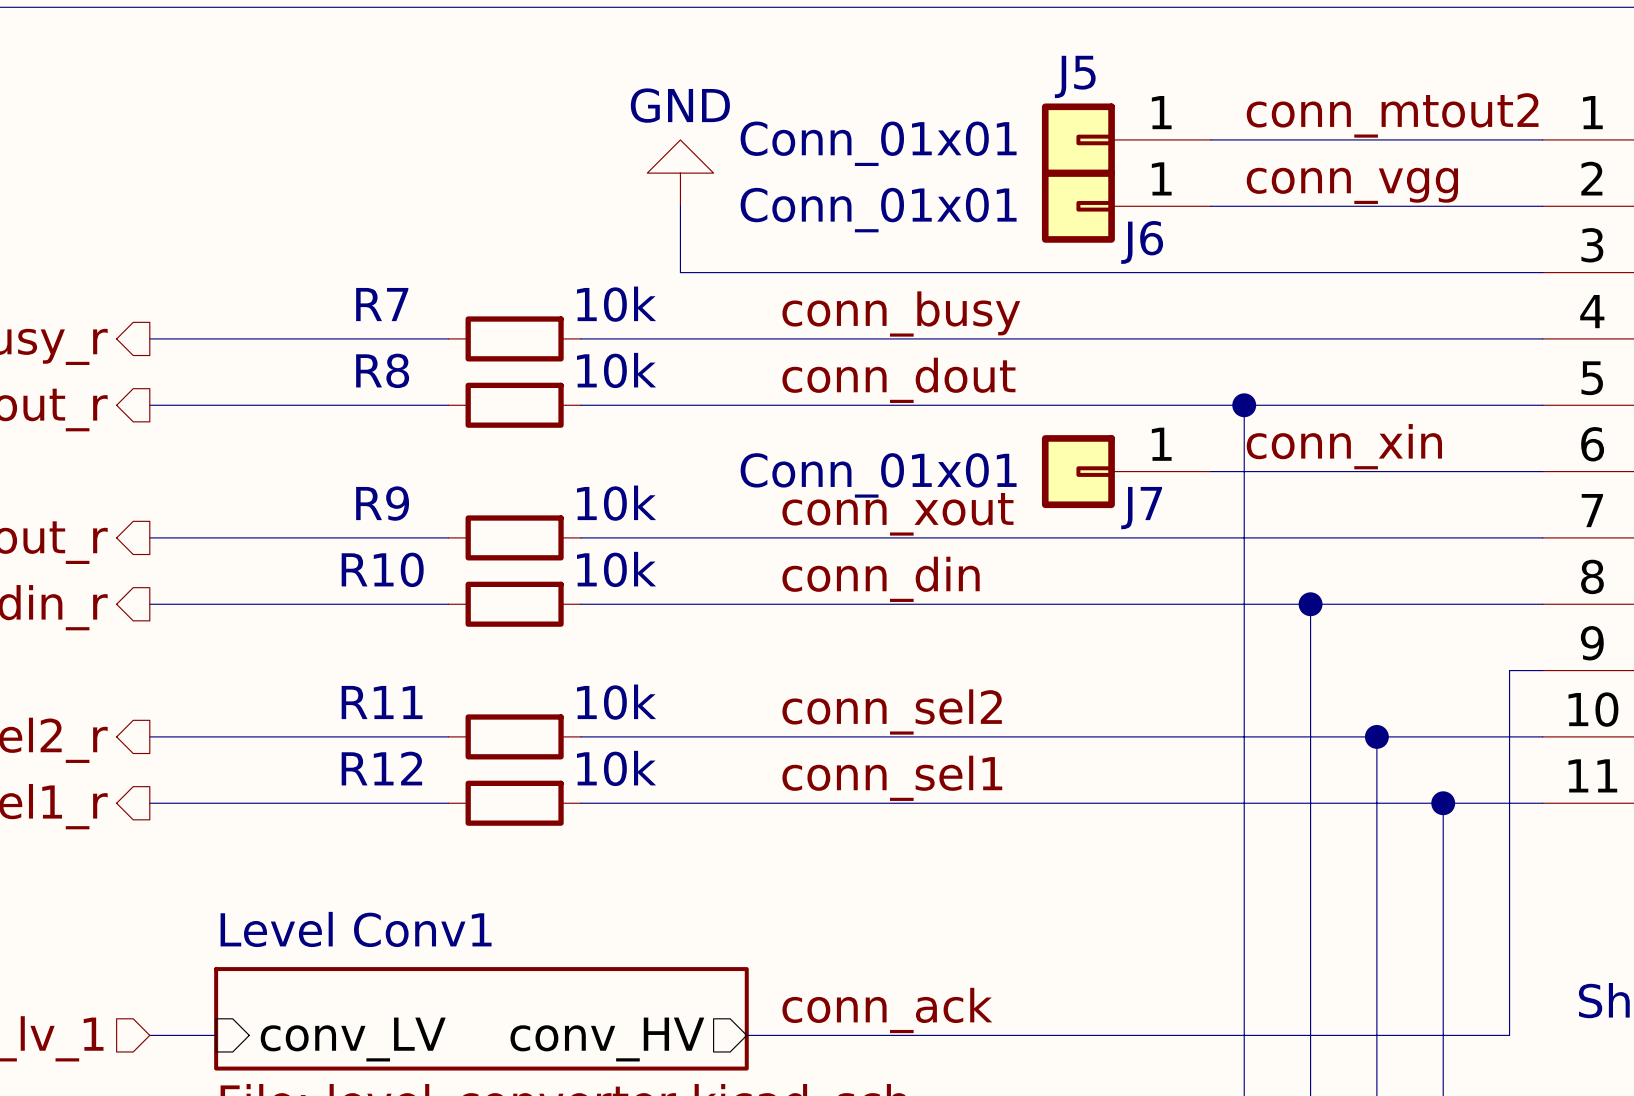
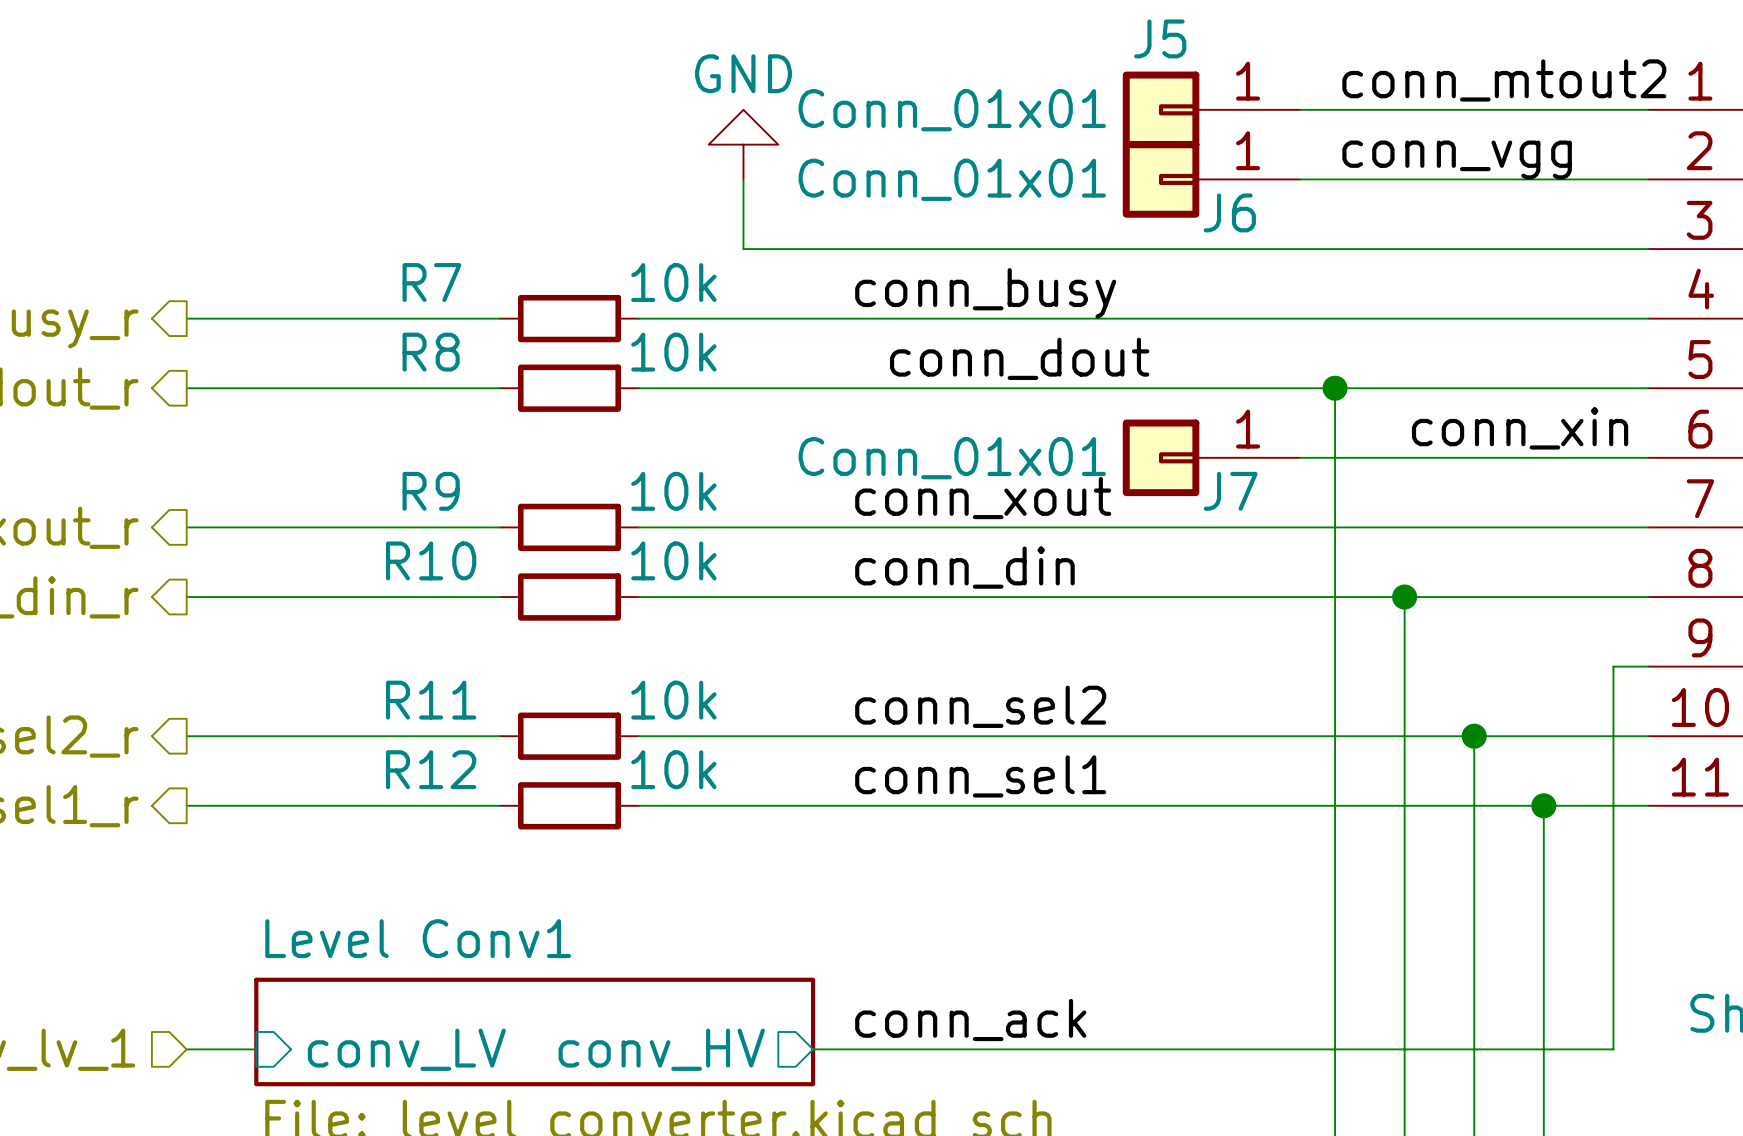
label position: conn_dout (898, 380) -> conn_dout (1019, 358)
label position: conn_xin (1344, 446) -> conn_xin (1520, 428)

